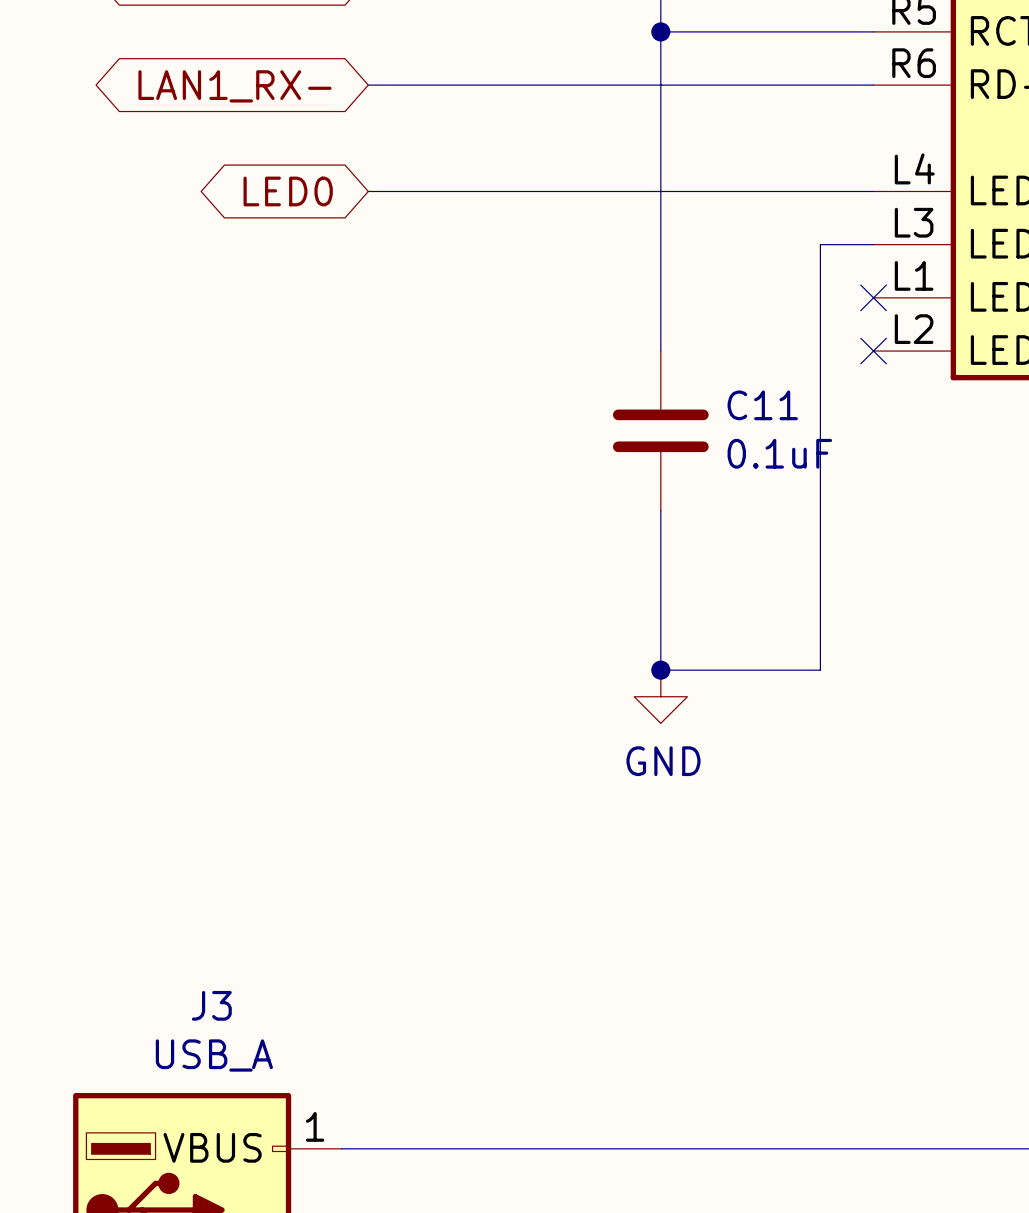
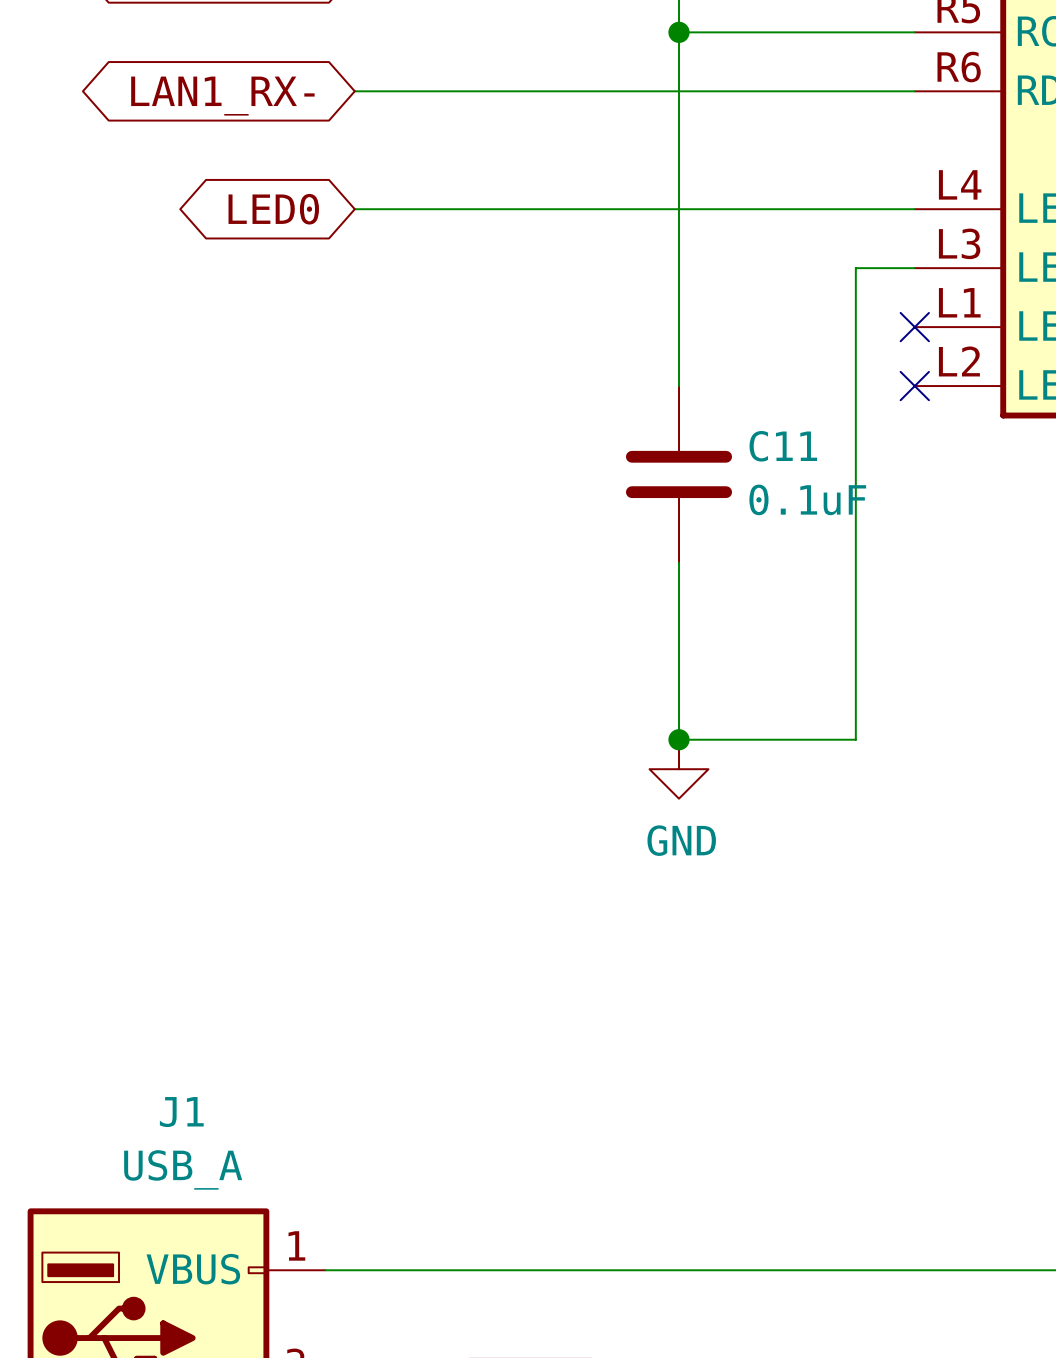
J3 name: J3 (211, 1005) -> J1 (181, 1112)

